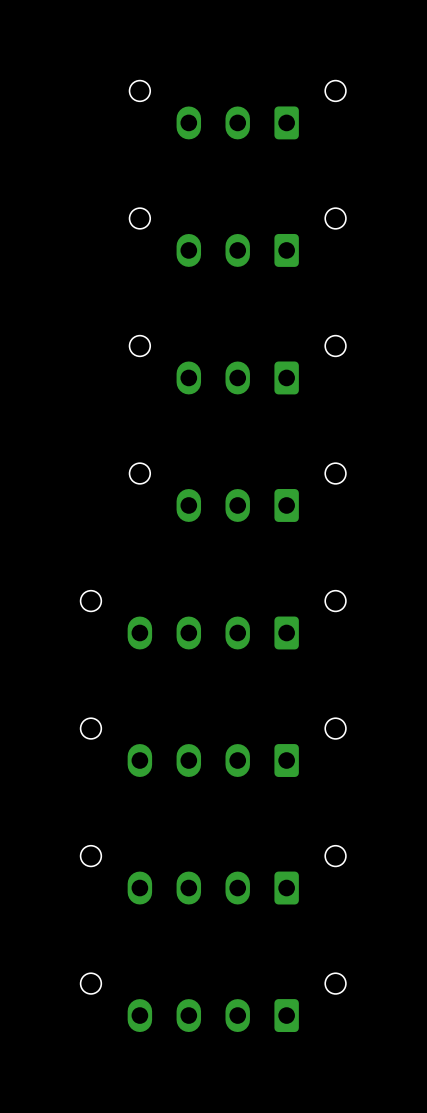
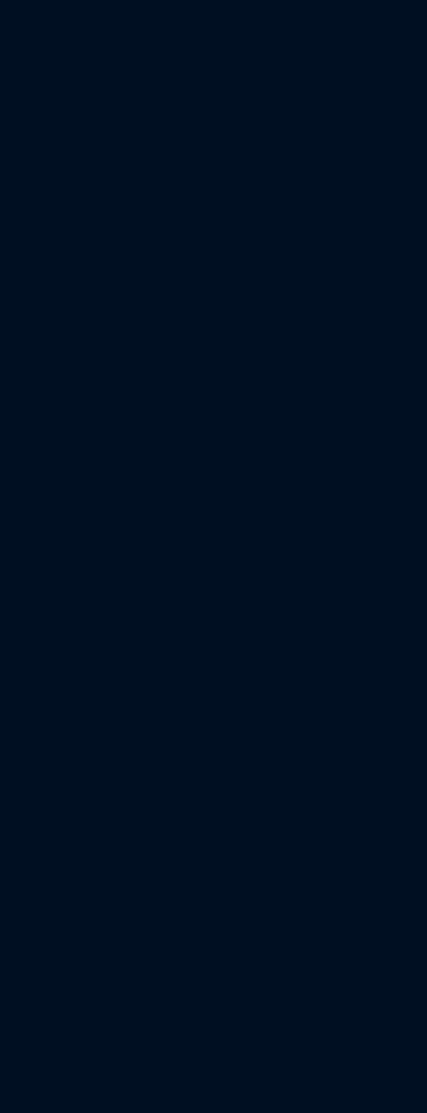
part: (237, 110) -> none
part: (237, 237) -> none
part: (237, 365) -> none
part: (237, 492) -> none
part: (213, 620) -> none
part: (213, 747) -> none
part: (213, 875) -> none
part: (213, 1002) -> none

